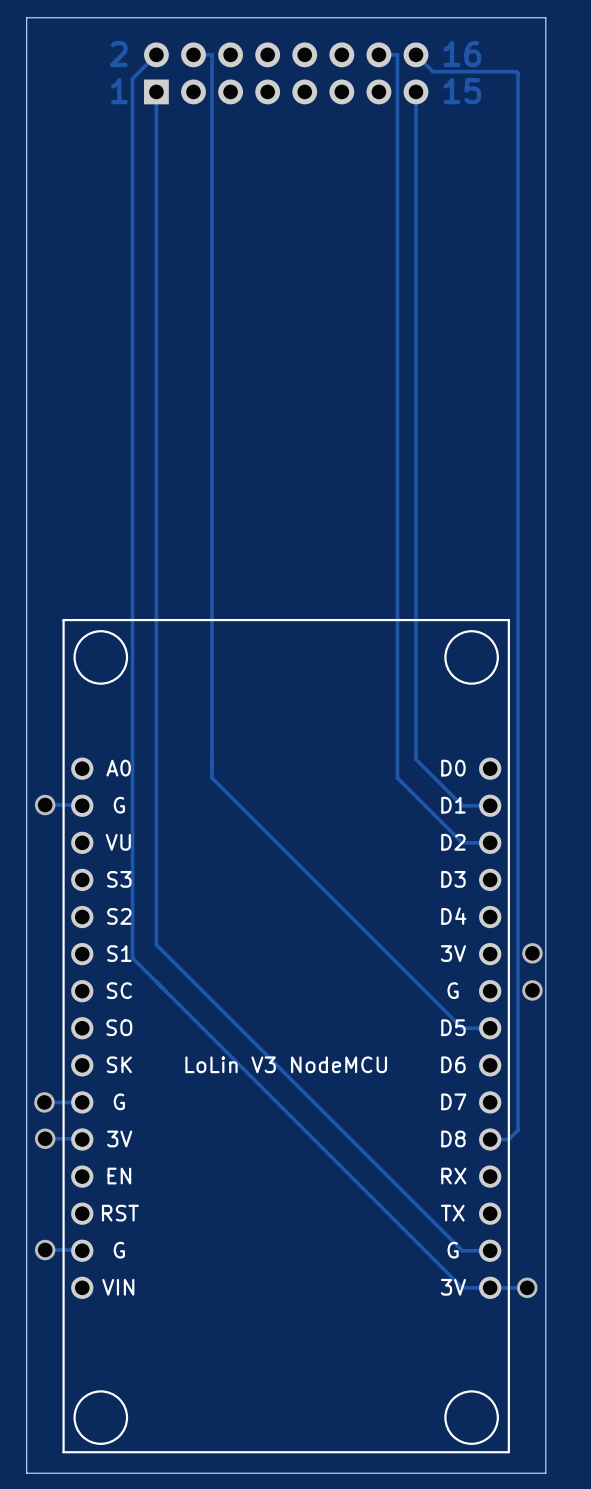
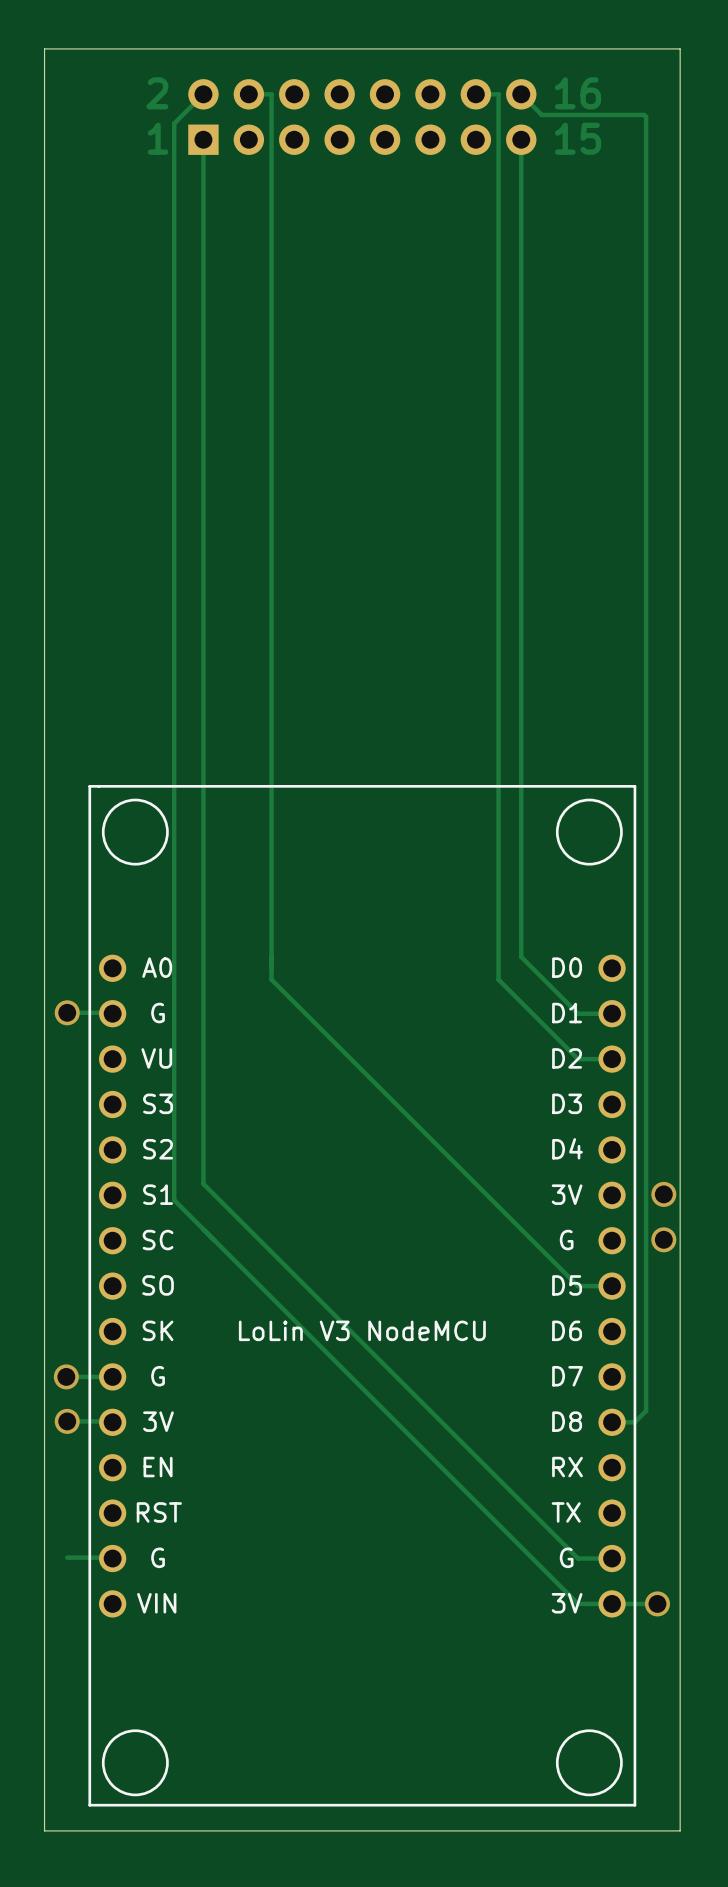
via: (45, 1250) -> none

